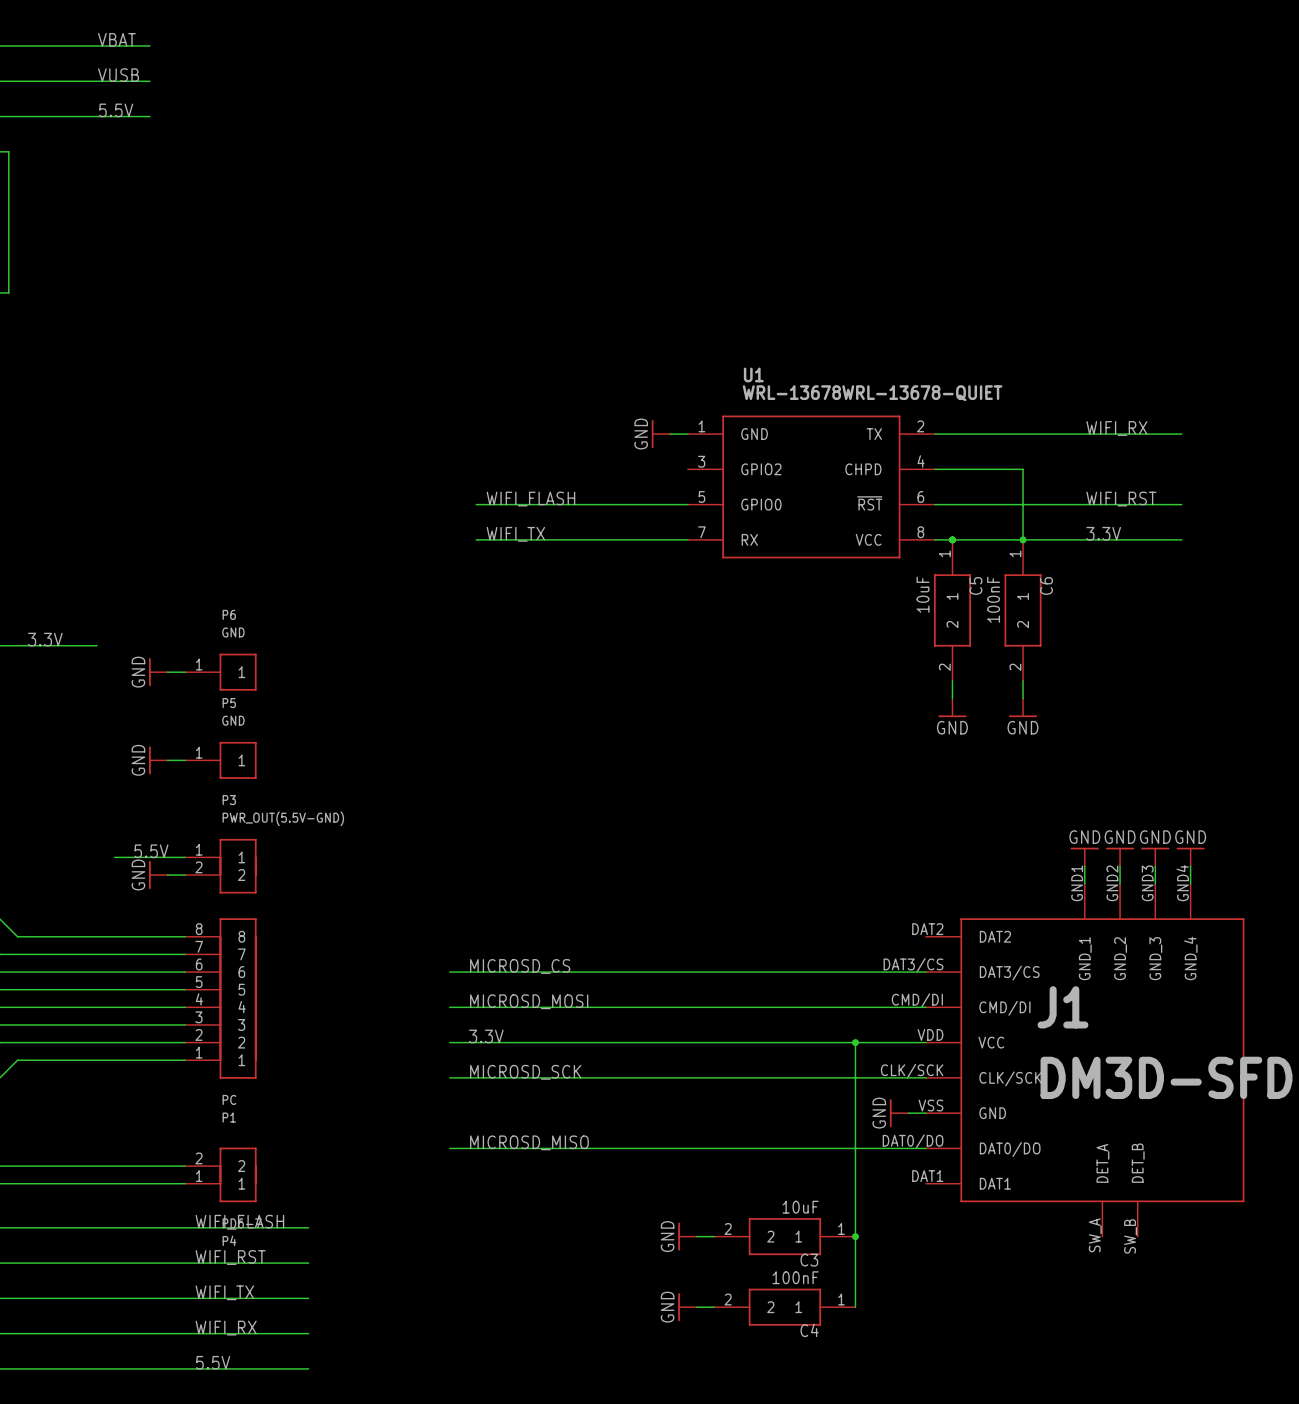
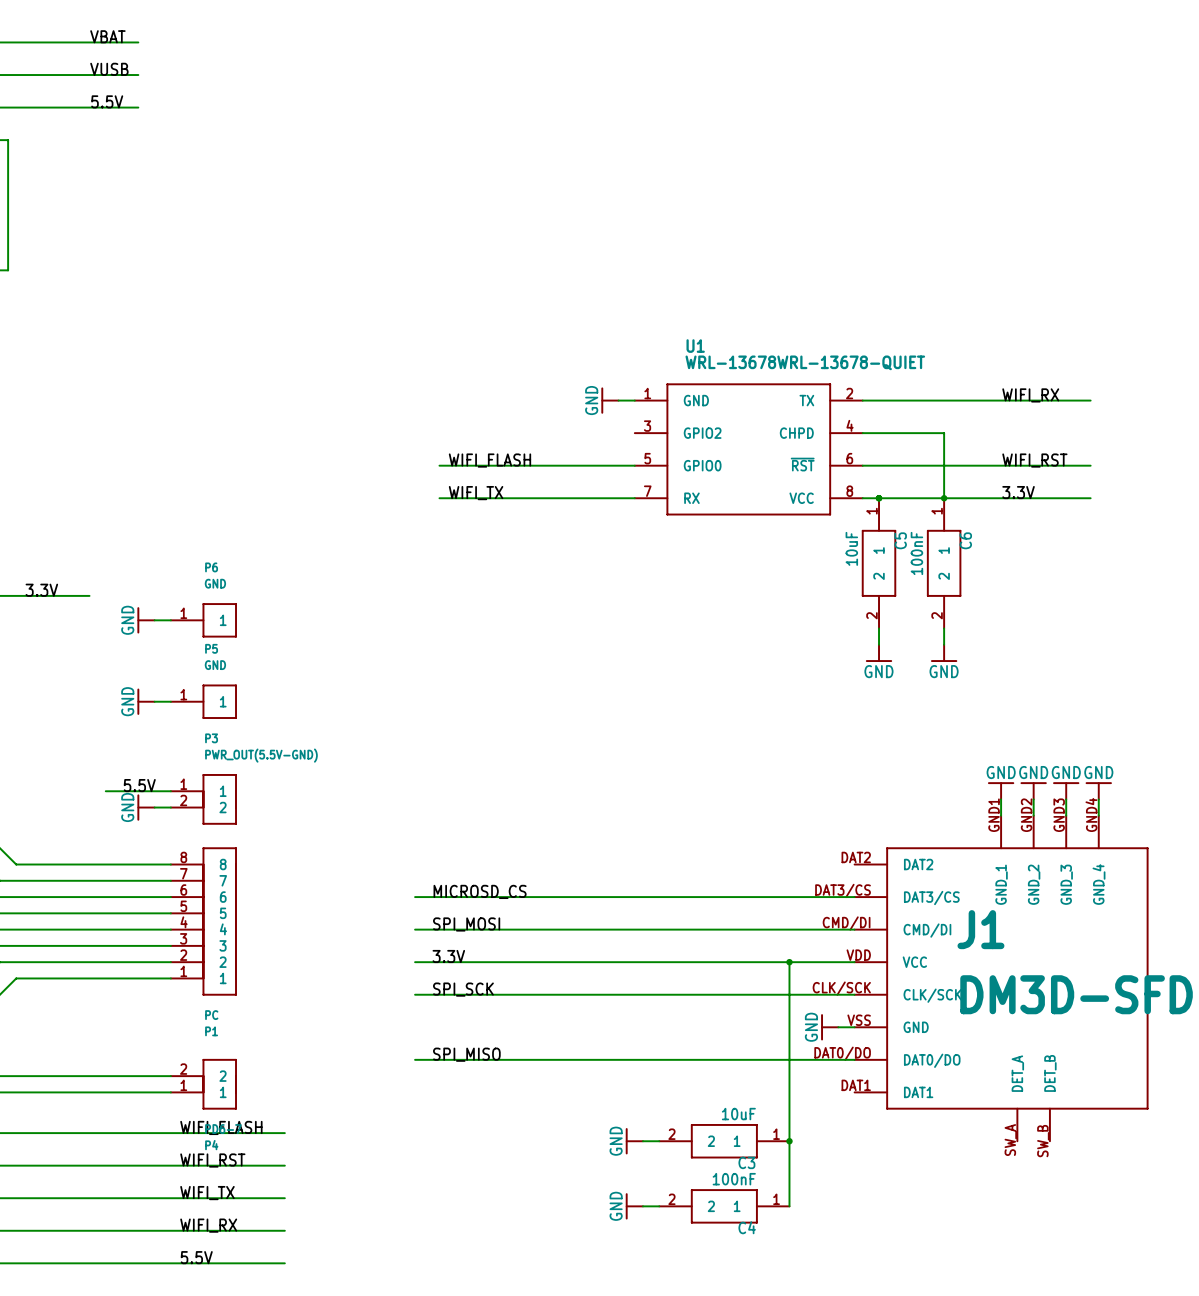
label: MICROSD_MOSI (529, 1001) -> SPI_MOSI (466, 924)
label: MICROSD_SCK (525, 1072) -> SPI_SCK (463, 989)
label: MICROSD_MISO (529, 1142) -> SPI_MISO (466, 1054)

